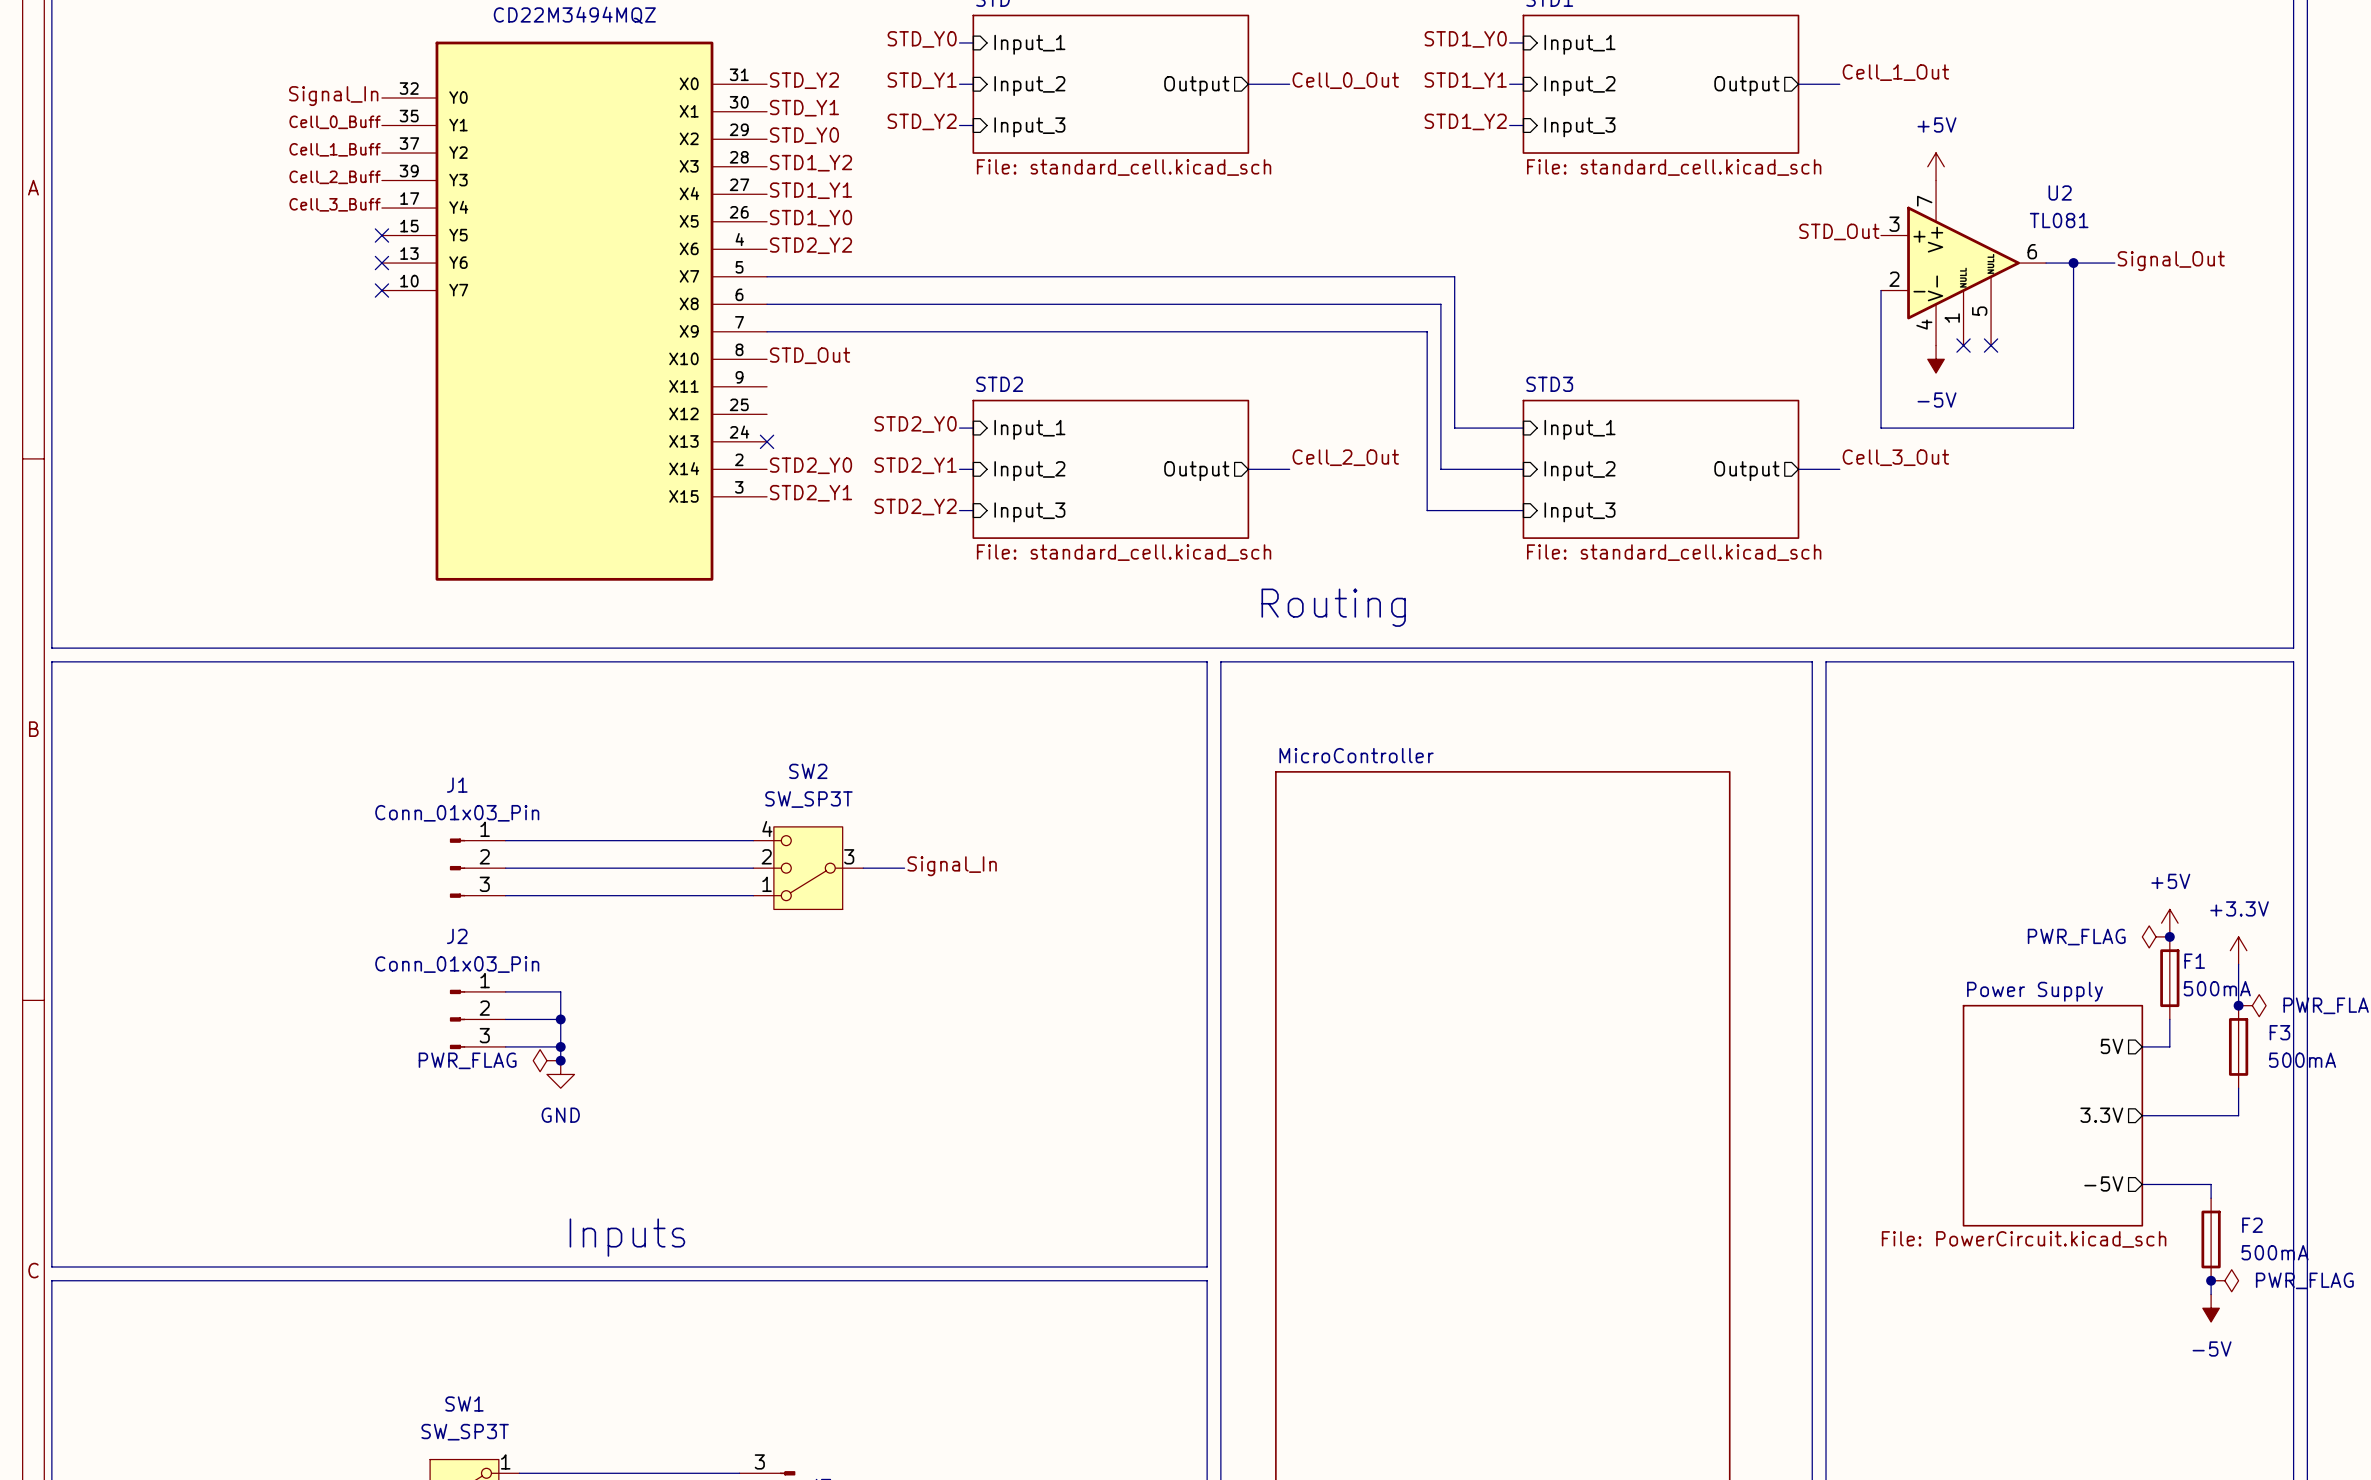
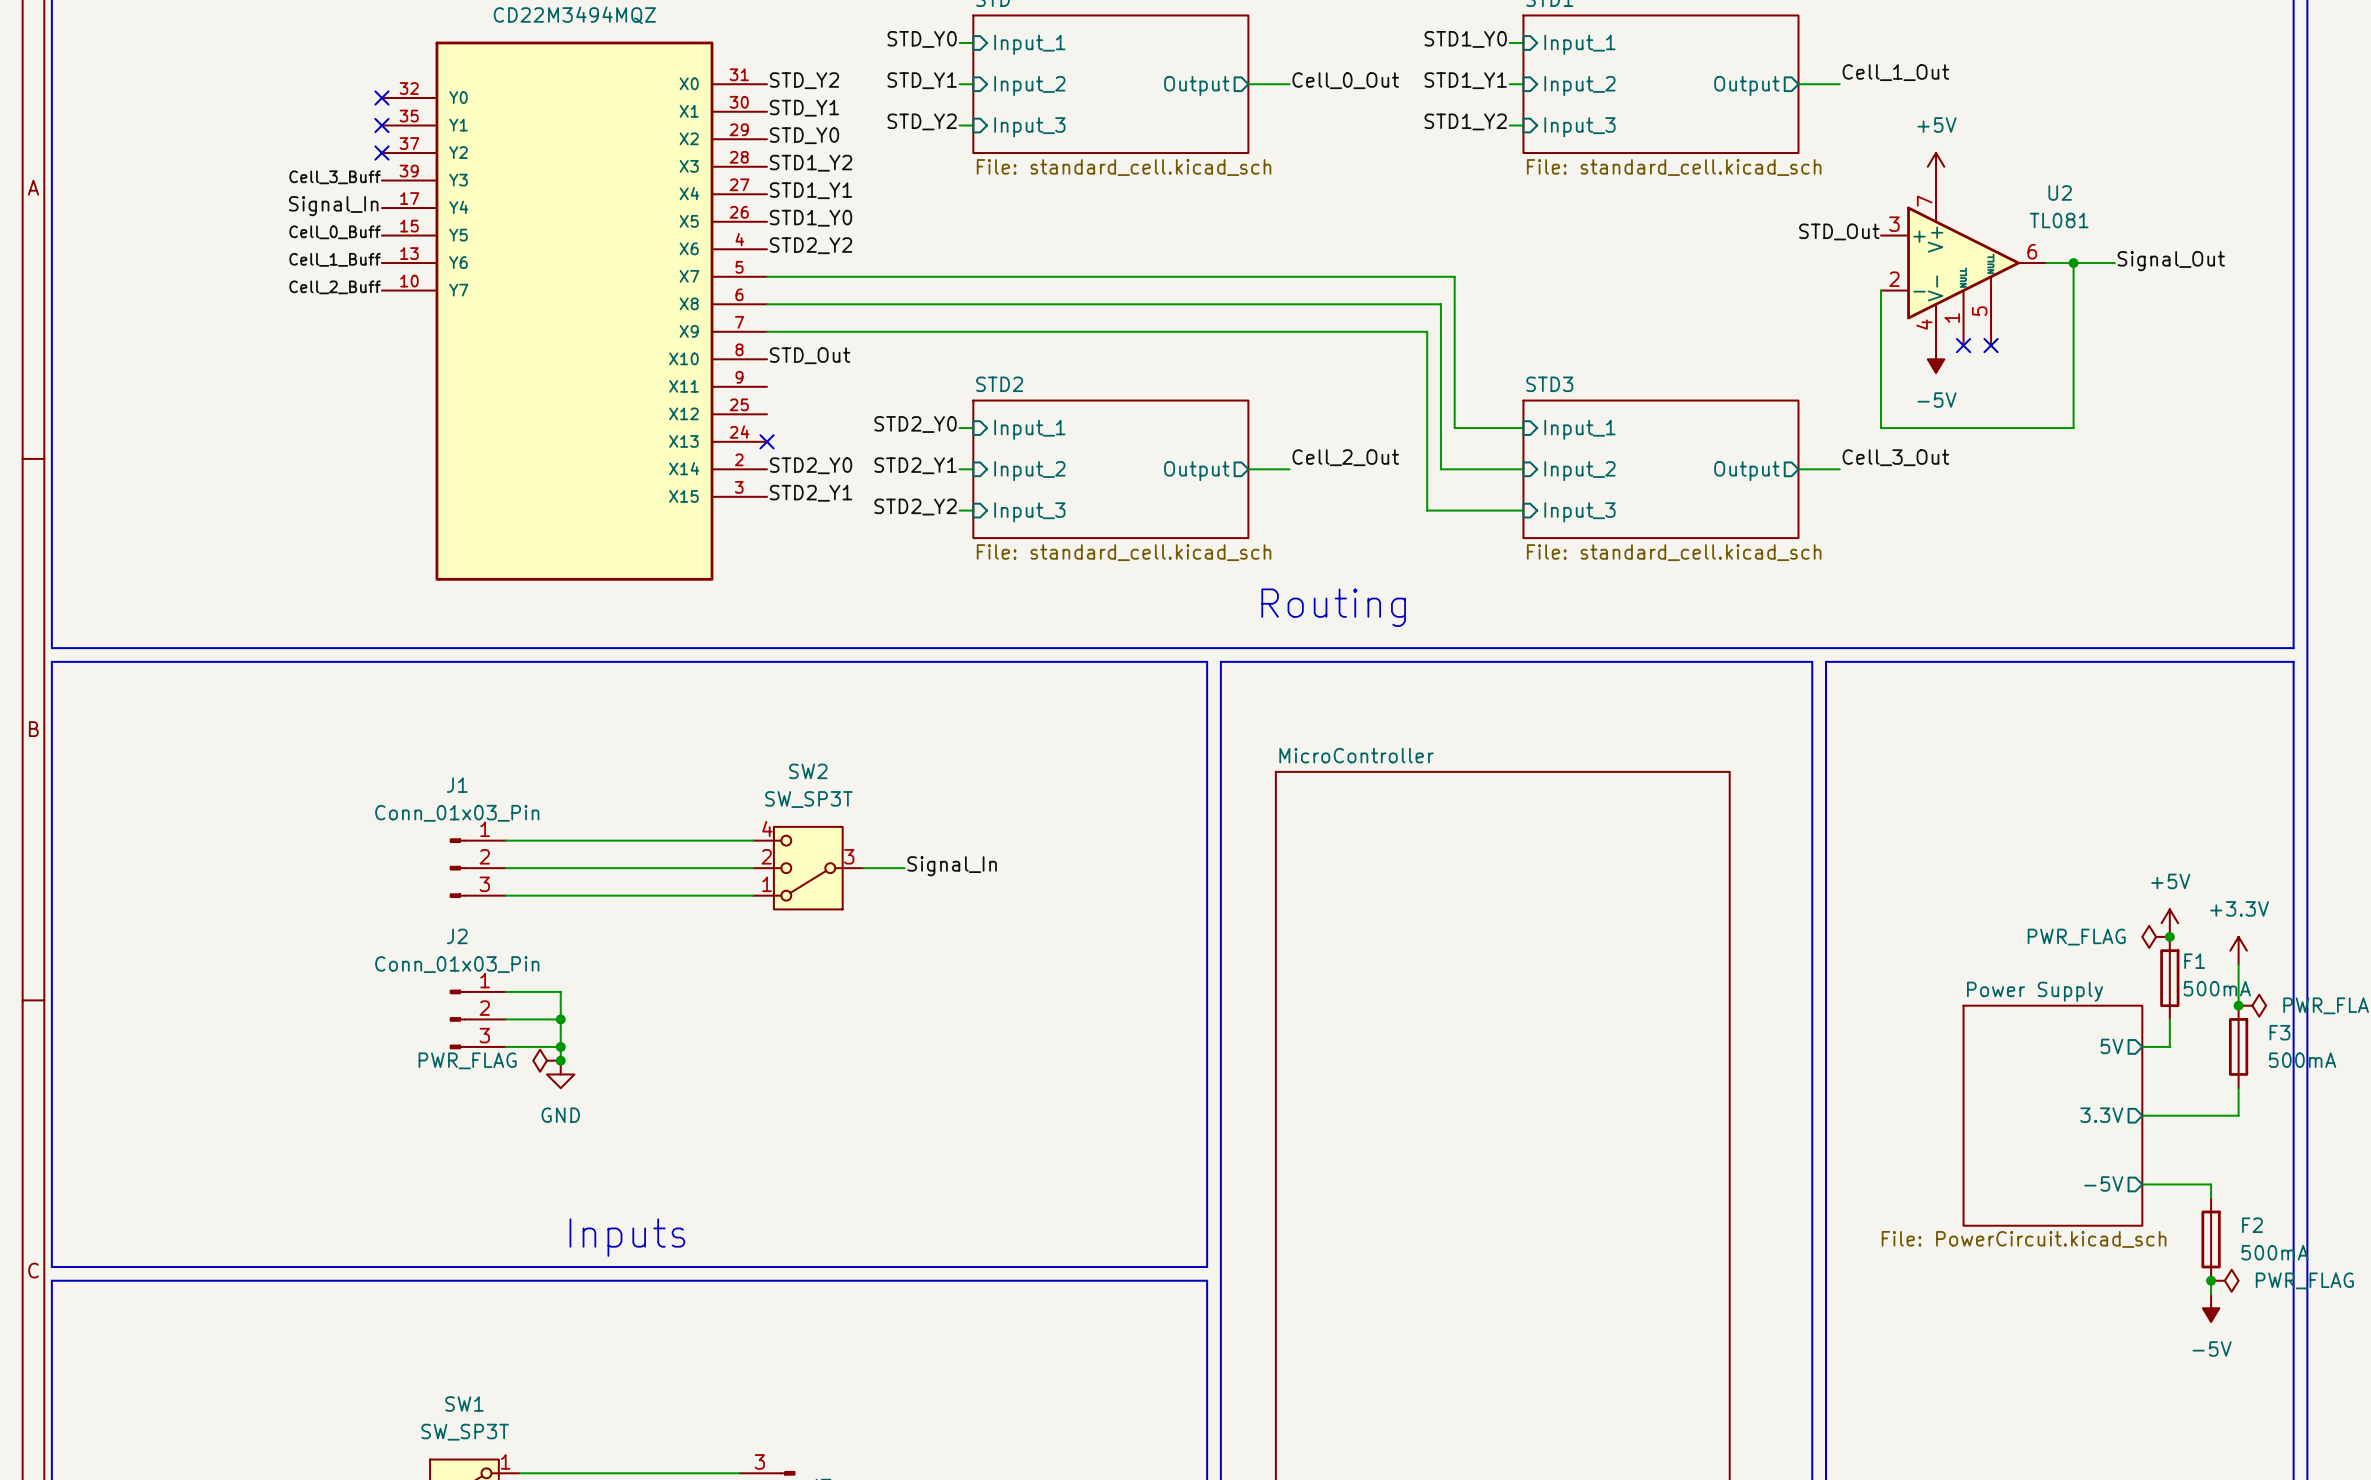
label: Signal_In (333, 96) -> none
no-connect mark: none -> (381, 97)
label position: Cell_0_Buff (335, 122) -> Cell_0_Buff (335, 232)
no-connect mark: none -> (381, 125)
label position: Cell_1_Buff (335, 149) -> Cell_1_Buff (335, 259)
no-connect mark: none -> (381, 153)
label: Cell_2_Buff (335, 177) -> Cell_3_Buff (335, 177)
label: Cell_3_Buff (335, 204) -> Signal_In (333, 206)
no-connect mark: (381, 235) -> none
no-connect mark: (381, 263) -> none
label: none -> Cell_2_Buff (335, 287)
no-connect mark: (381, 290) -> none

